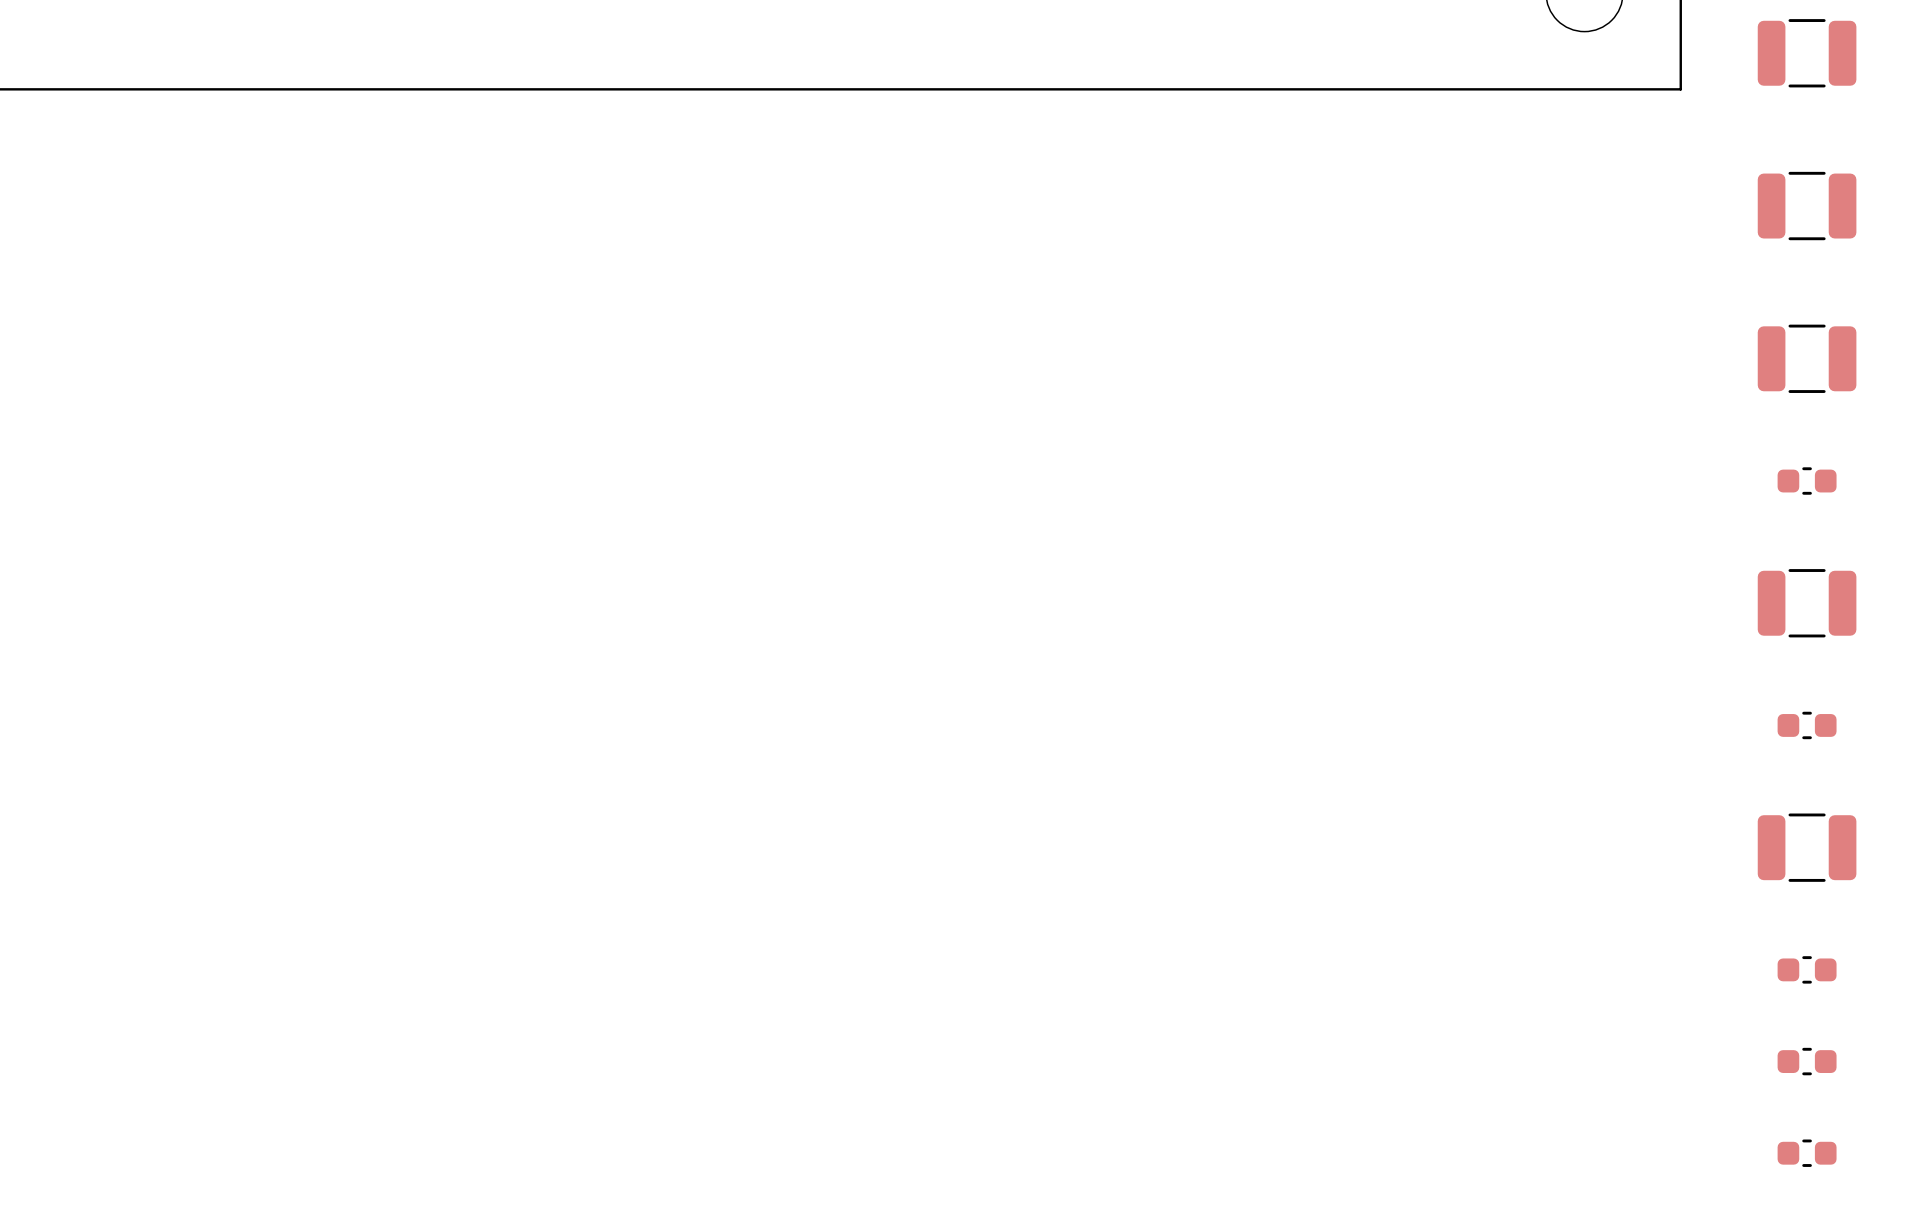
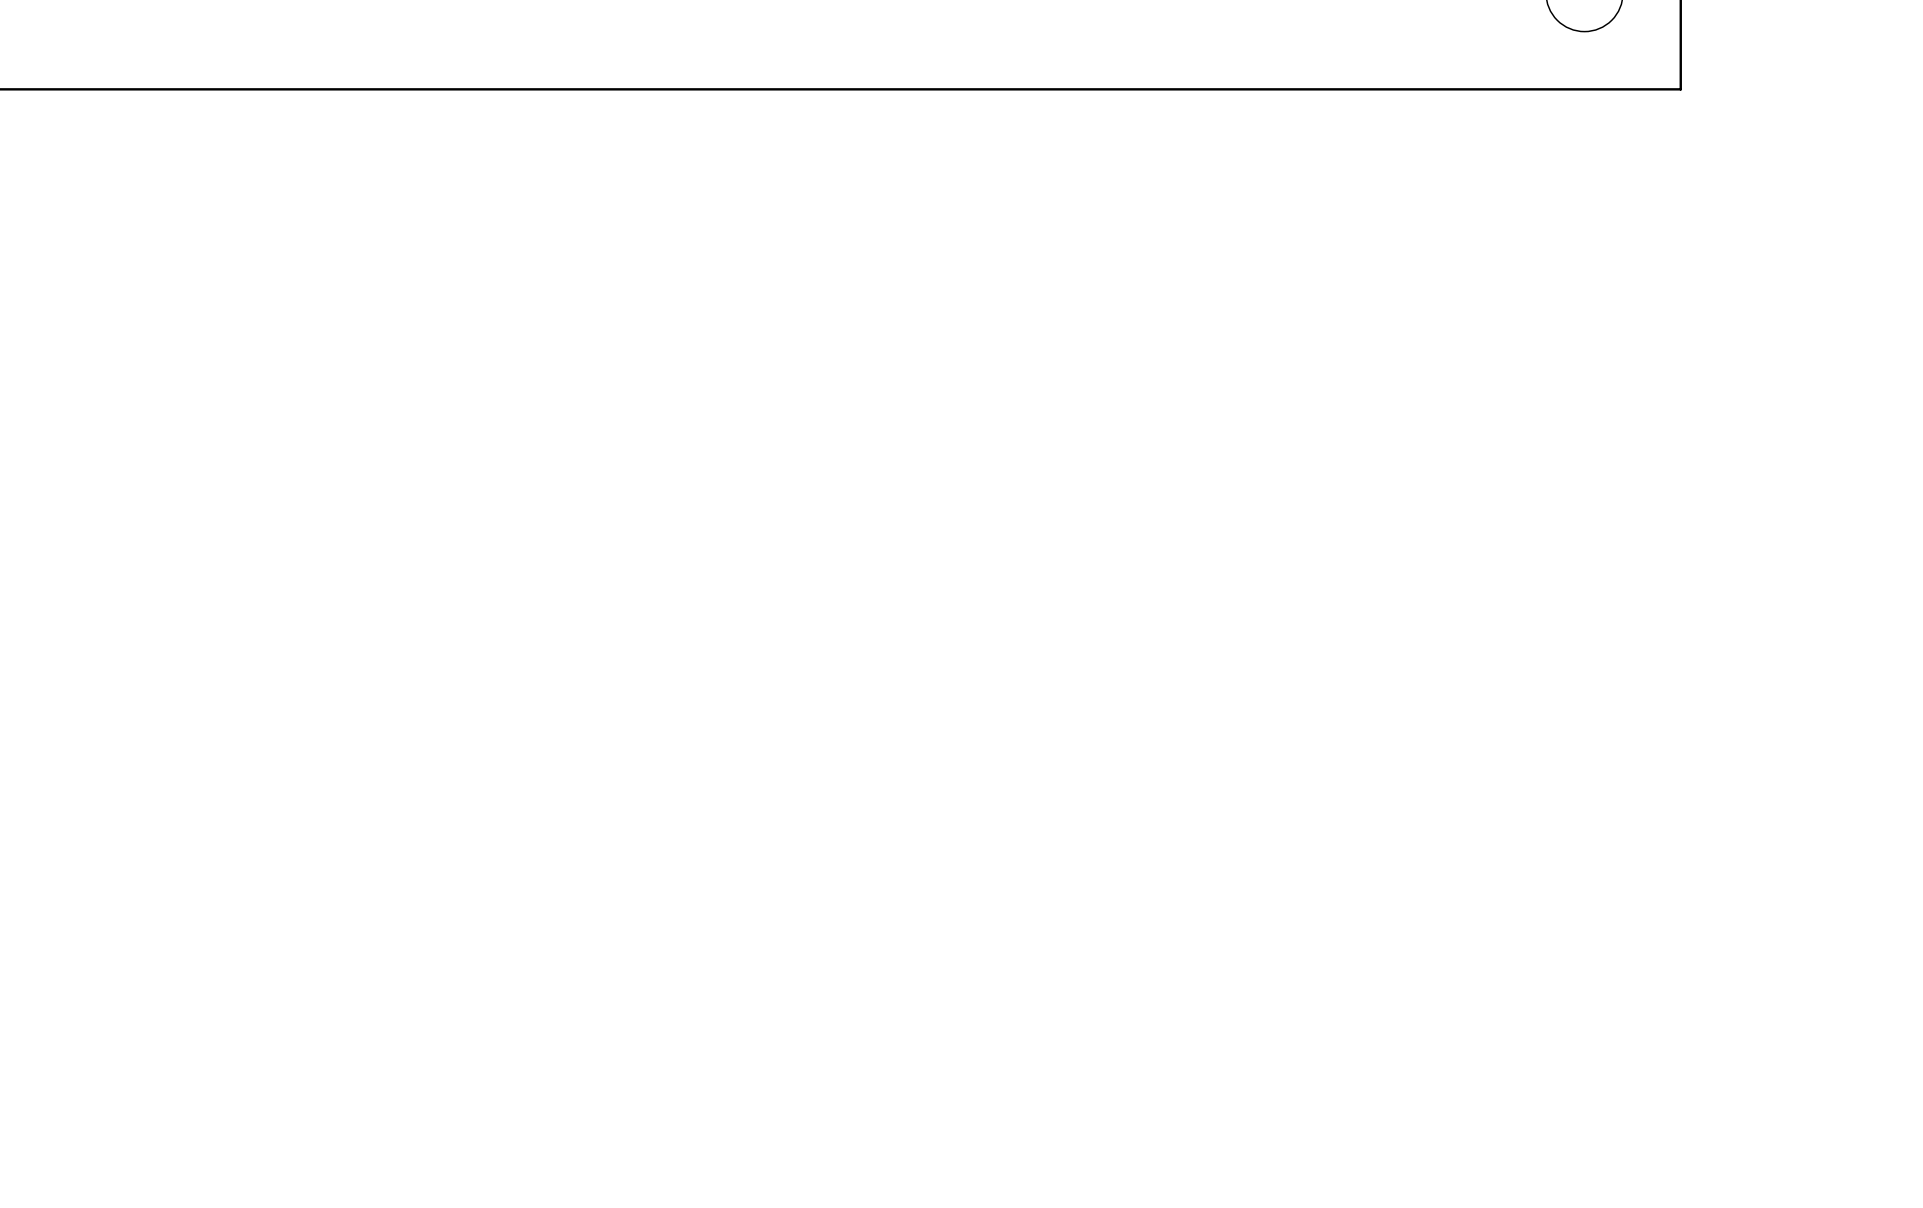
part: (1807, 53) -> none
part: (1807, 206) -> none
part: (1807, 358) -> none
part: (1807, 481) -> none
part: (1807, 603) -> none
part: (1807, 725) -> none
part: (1807, 847) -> none
part: (1807, 969) -> none
part: (1807, 1061) -> none
part: (1807, 1153) -> none

